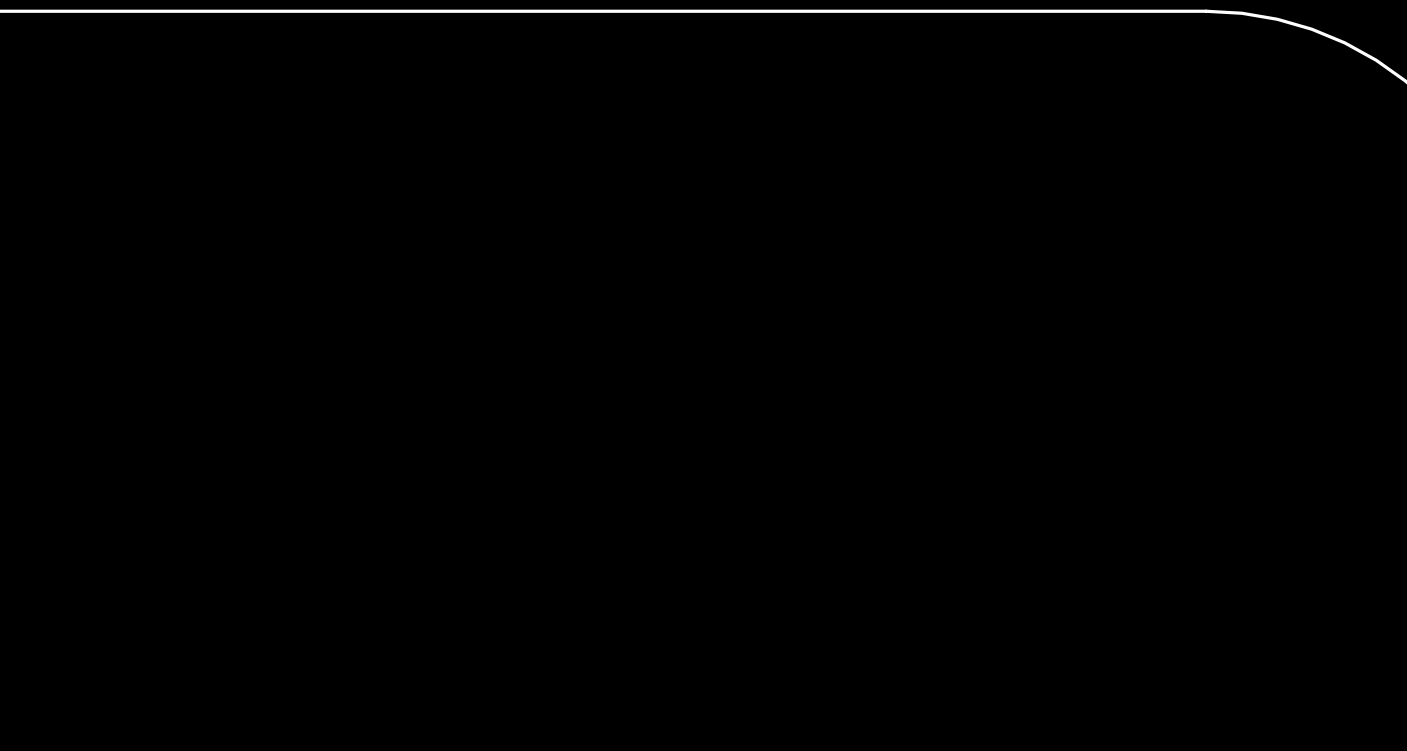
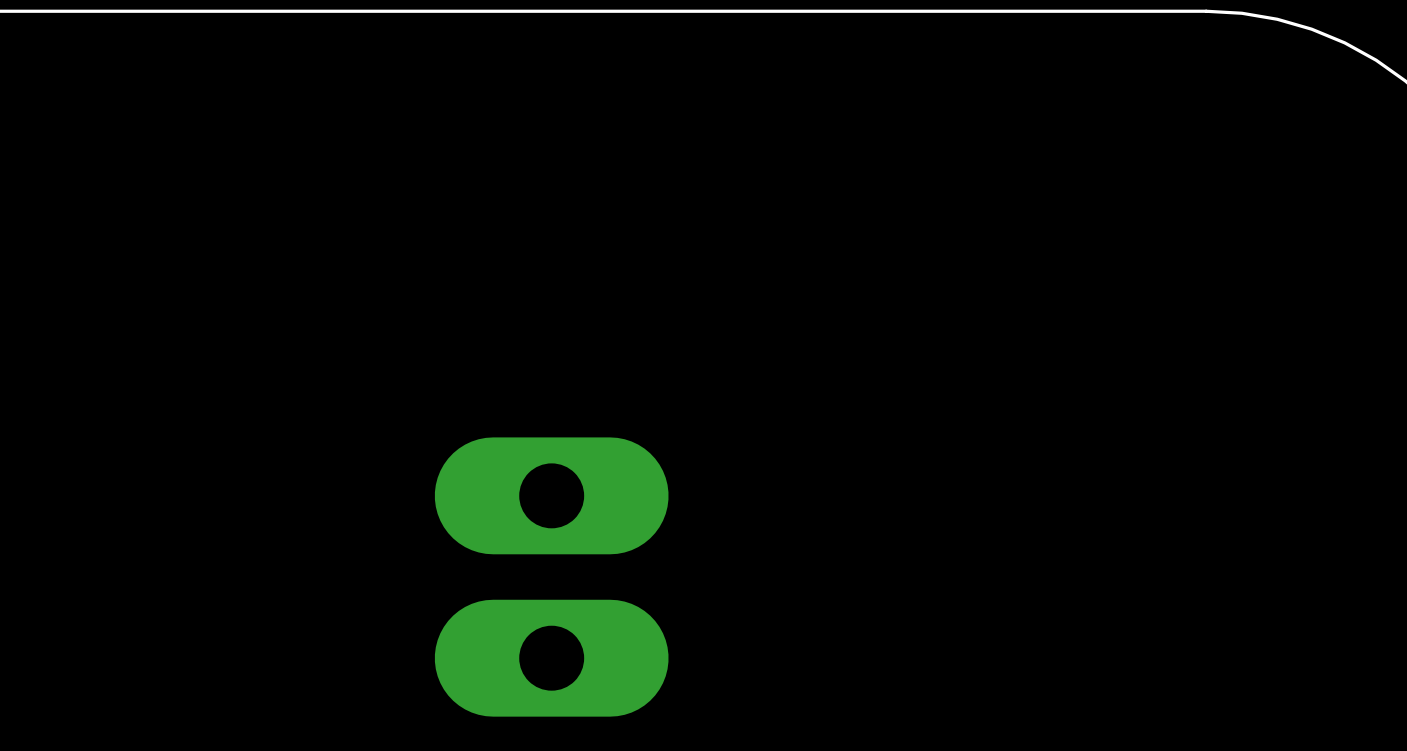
part: none -> (551, 577)

